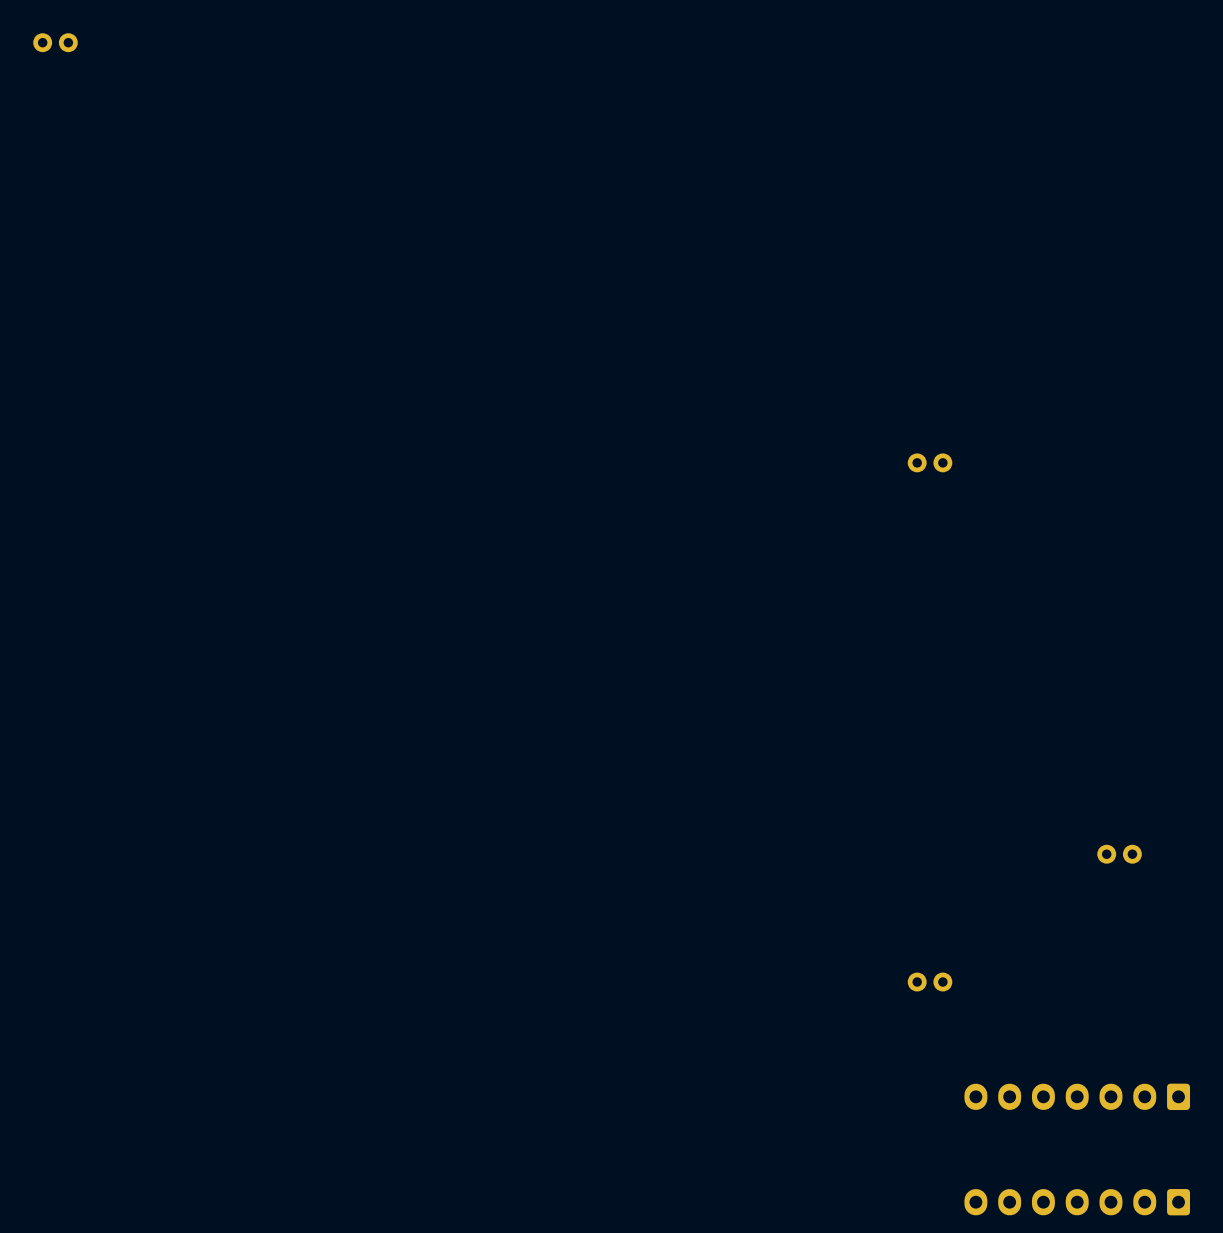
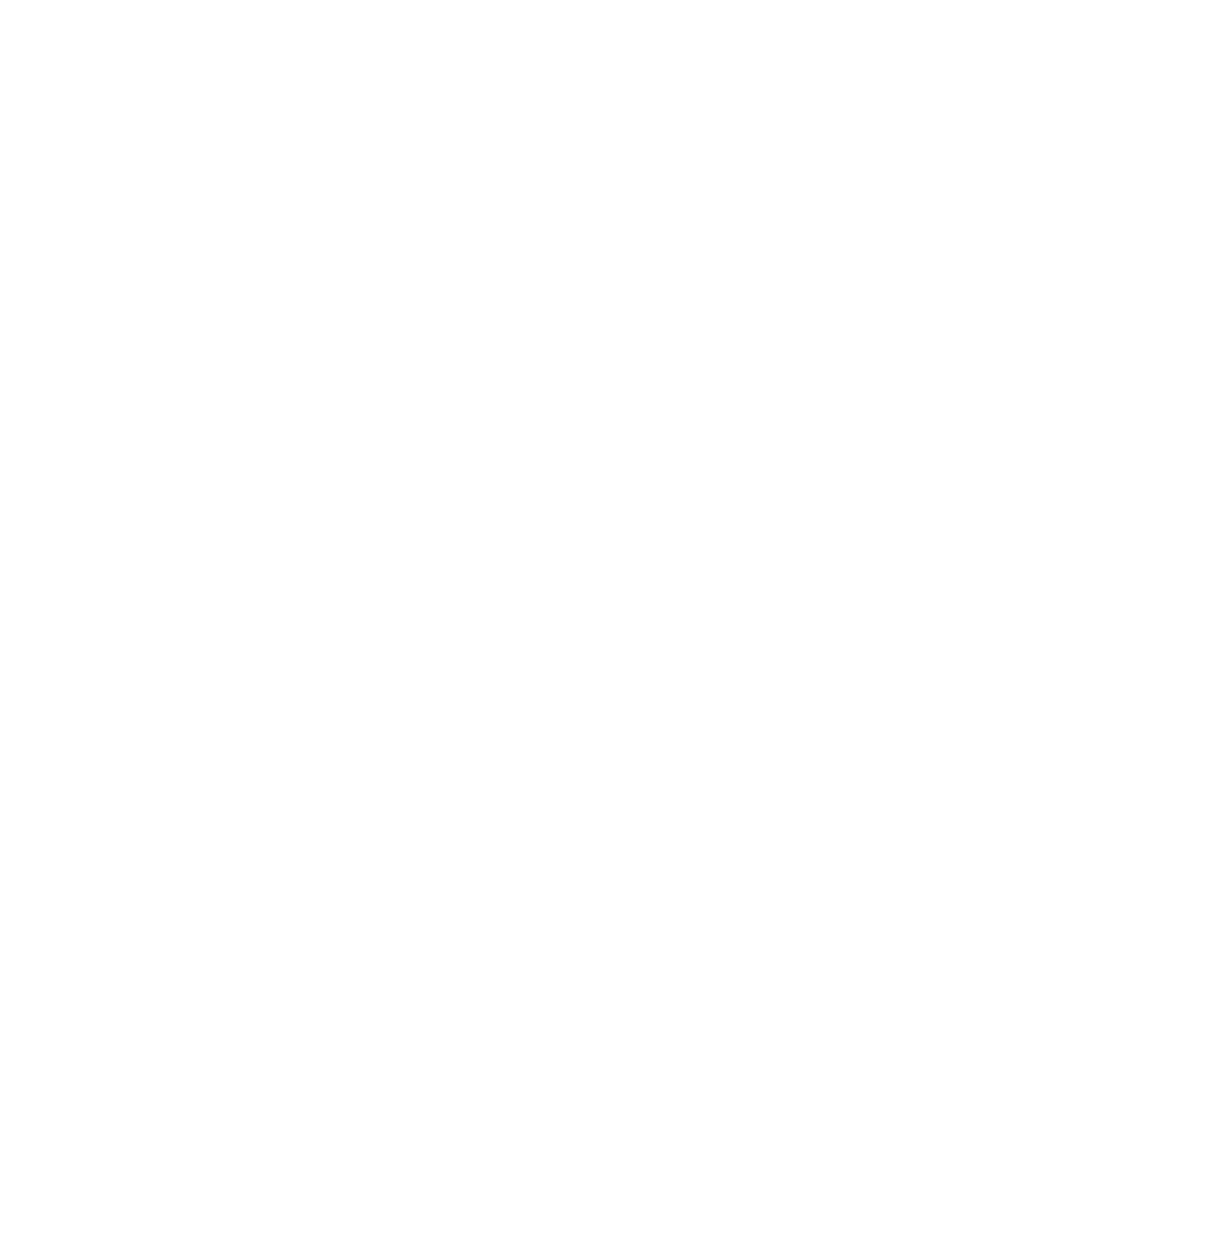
part: (55, 42) -> none
part: (930, 462) -> none
part: (1119, 854) -> none
part: (930, 982) -> none
part: (1077, 1096) -> none
part: (1077, 1202) -> none

